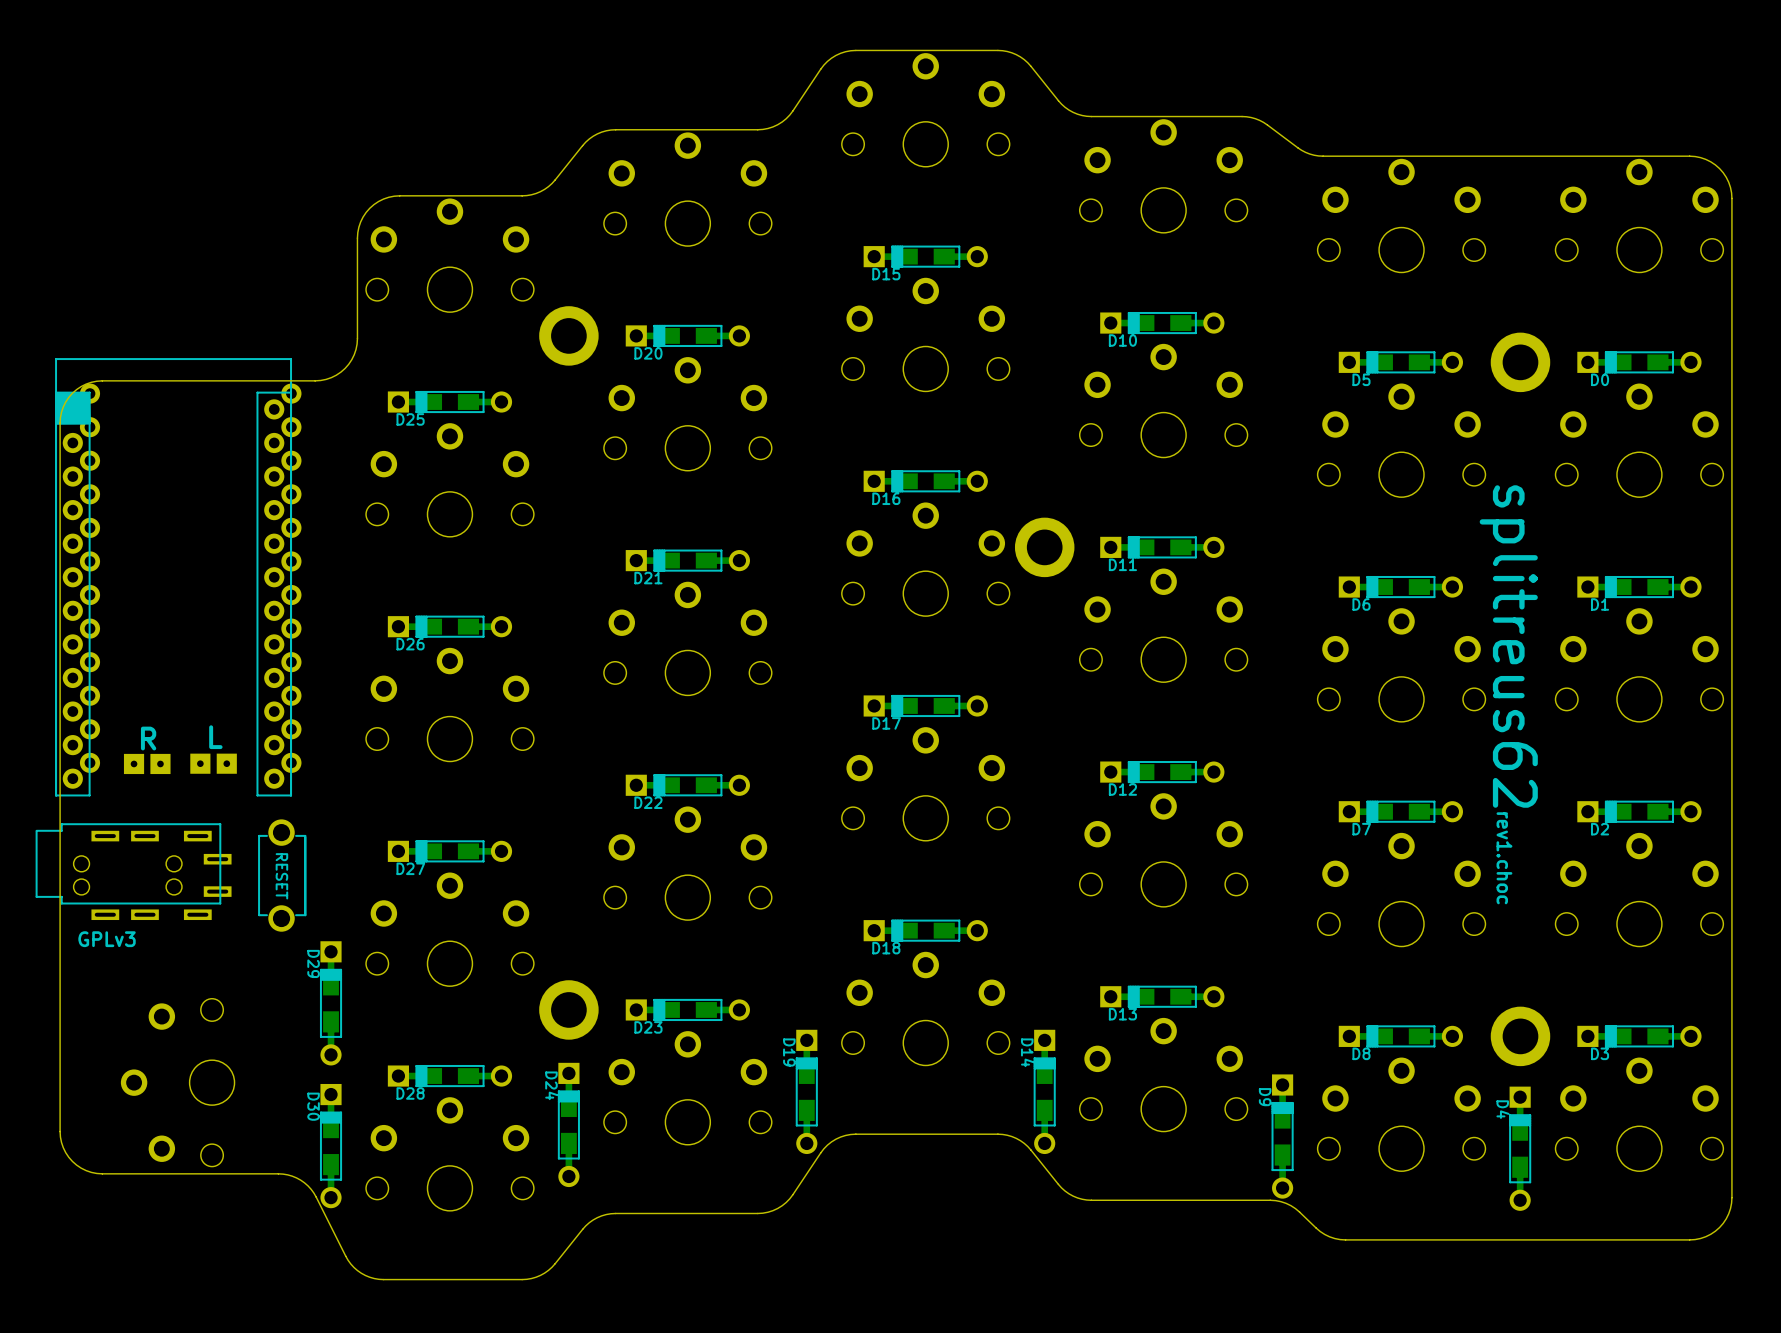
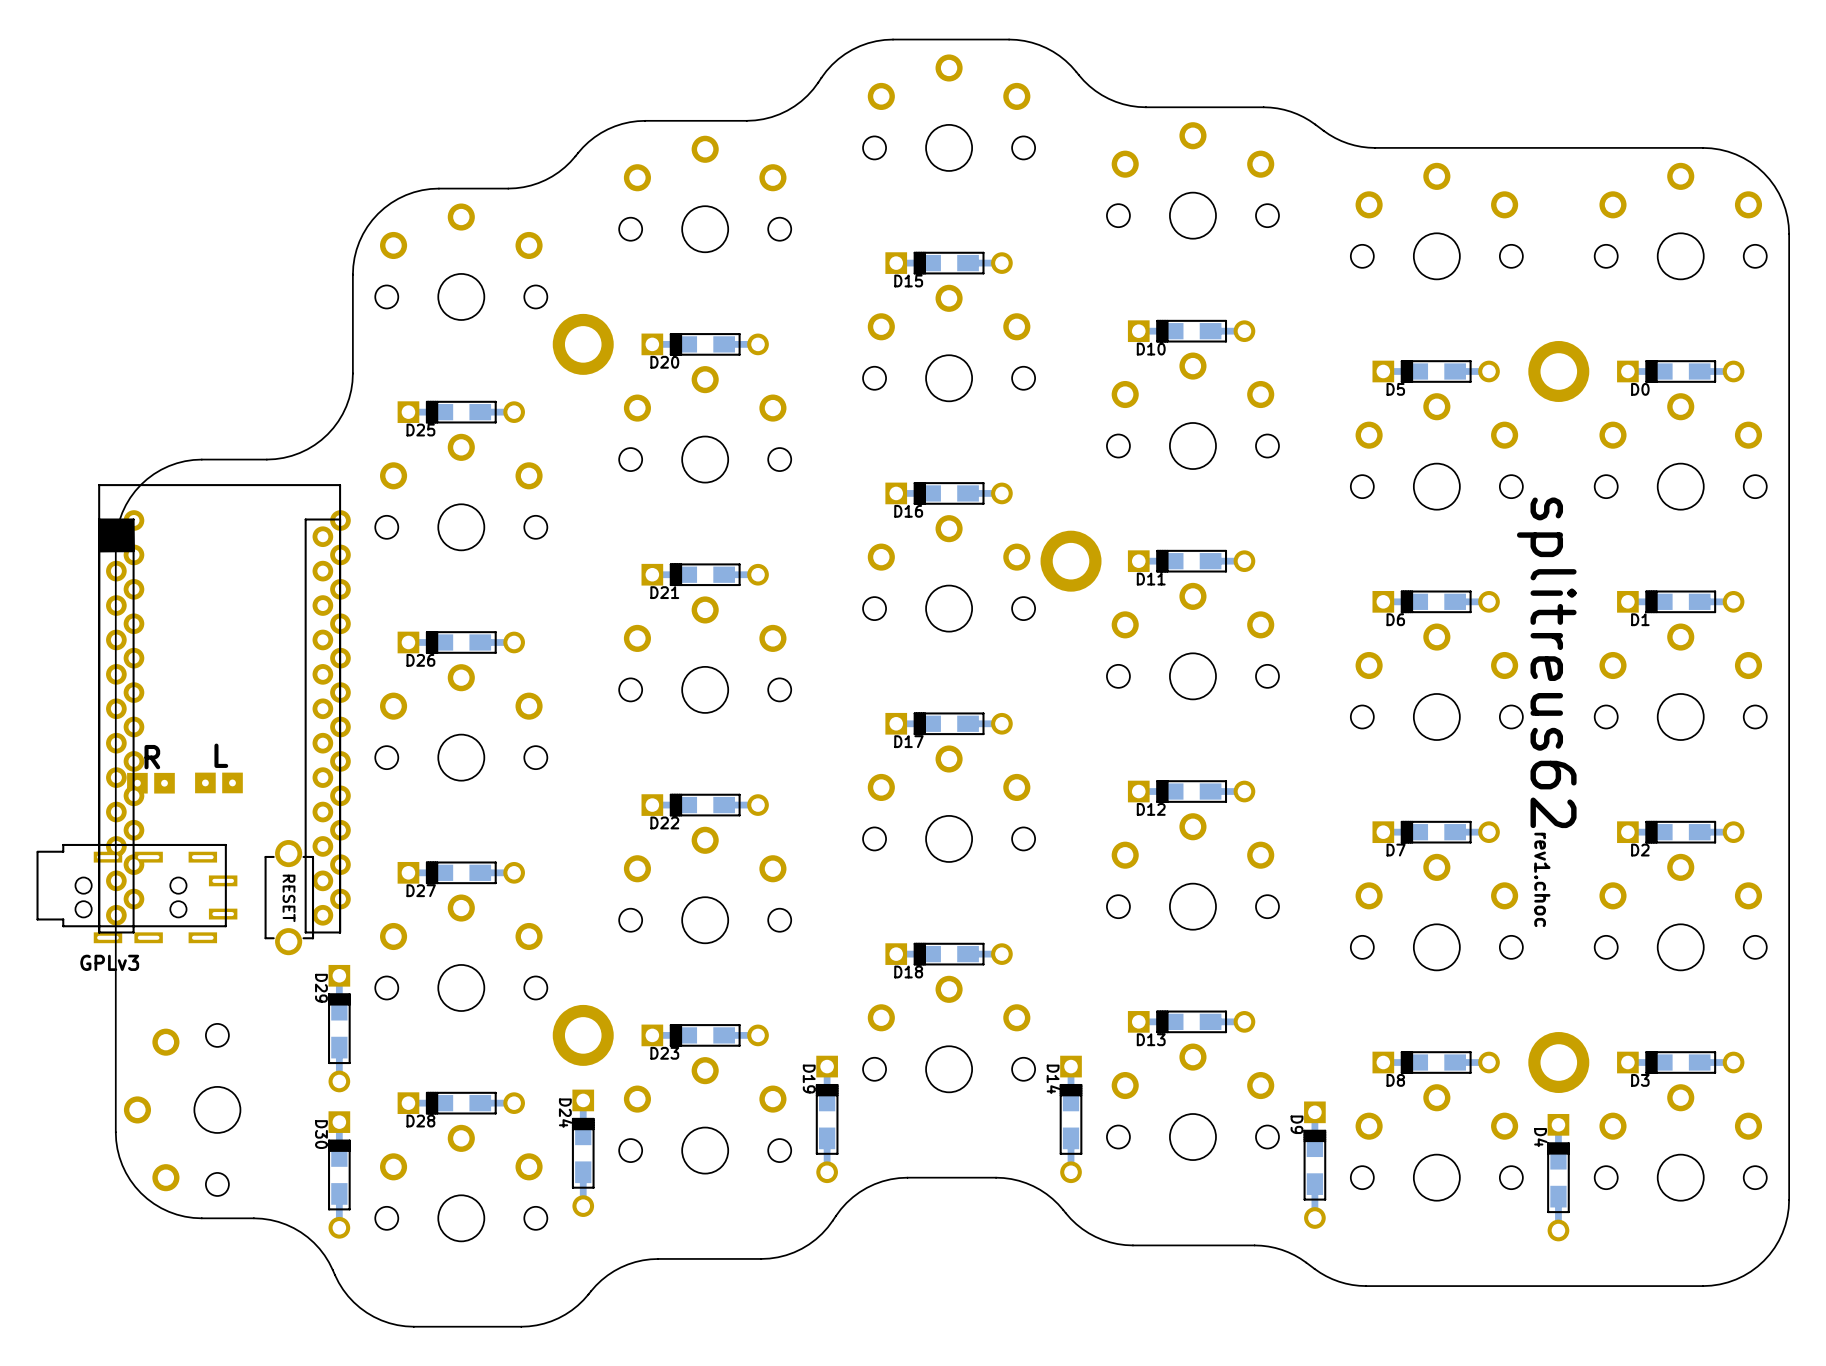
board edge: (997, 50) (845, 51) (835, 55) (823, 65) (789, 115) (772, 126) (757, 129) (606, 130) (597, 133) (585, 142) (552, 183) (536, 193) (522, 195) (399, 195) (383, 199) (366, 212) (358, 227) (357, 344) (351, 359) (336, 375) (315, 380) (96, 381) (81, 386) (68, 397) (61, 412) (60, 423) (60, 1131) (65, 1152) (76, 1165) (91, 1172) (102, 1173) (278, 1173) (292, 1176) (304, 1182) (313, 1193) (350, 1264) (365, 1275) (383, 1279) (522, 1279) (536, 1277) (552, 1267) (585, 1225) (597, 1217) (606, 1214) (768, 1212) (782, 1205) (789, 1198) (827, 1145) (840, 1137) (855, 1134) (1007, 1135) (1016, 1138) (1027, 1146) (1061, 1187) (1077, 1197) (1091, 1200) (1275, 1200) (1295, 1208) (1324, 1234) (1340, 1239) (1689, 1239) (1710, 1234) (1723, 1223) (1730, 1208) (1731, 1197) (1731, 198) (1726, 177) (1710, 161) (1695, 156) (1318, 155) (1301, 150) (1263, 122) (1251, 117) (1082, 115) (1068, 110) (1061, 104) (1024, 59) (1011, 52) (997, 50) -> (1009, 39) (1031, 42) (1053, 51) (1065, 60) (1095, 90) (1108, 98) (1130, 105) (1277, 108) (1303, 117) (1341, 141) (1368, 147) (1711, 148) (1728, 151) (1743, 158) (1757, 167) (1774, 186) (1785, 208) (1789, 233) (1789, 1200) (1785, 1225) (1774, 1247) (1763, 1260) (1743, 1275) (1728, 1282) (1711, 1285) (1359, 1285) (1332, 1279) (1294, 1255) (1268, 1246) (1132, 1245) (1110, 1242) (1082, 1229) (1046, 1194) (1018, 1180) (996, 1177) (899, 1178) (882, 1181) (859, 1192) (846, 1202) (815, 1239) (801, 1248) (786, 1255) (761, 1258) (642, 1260) (614, 1271) (601, 1280) (571, 1310) (544, 1323) (521, 1326) (413, 1326) (389, 1323) (373, 1316) (360, 1307) (343, 1289) (319, 1248) (307, 1237) (293, 1228) (278, 1221) (262, 1218) (185, 1216) (168, 1211) (154, 1203) (135, 1186) (125, 1172) (117, 1149) (115, 1132) (115, 545) (119, 520) (130, 497) (147, 479) (161, 469) (176, 463) (193, 459) (283, 457) (299, 453) (314, 445) (333, 428) (346, 406) (352, 381) (352, 274) (356, 249) (363, 234) (372, 220) (384, 208) (398, 198) (413, 192) (430, 188) (515, 188) (538, 183) (564, 167) (594, 137) (607, 129) (629, 122) (746, 120) (771, 117) (787, 110) (801, 101) (838, 59) (852, 49) (868, 43) (893, 39) (1009, 39)
part position: (178, 577) -> (224, 708)

